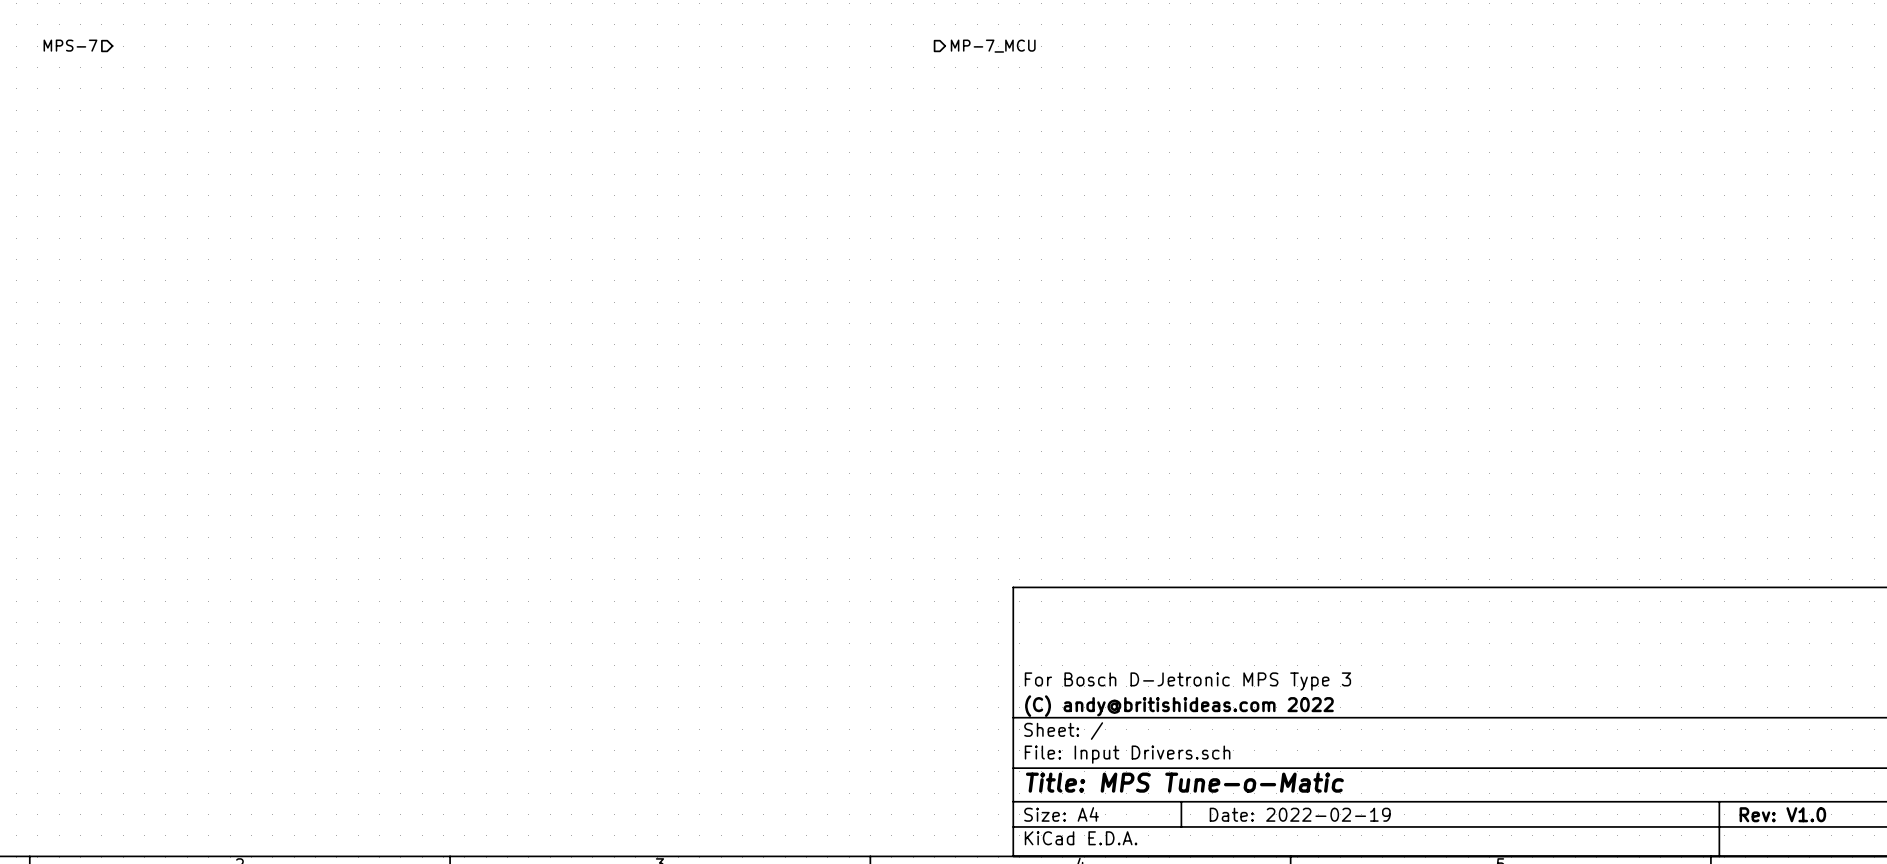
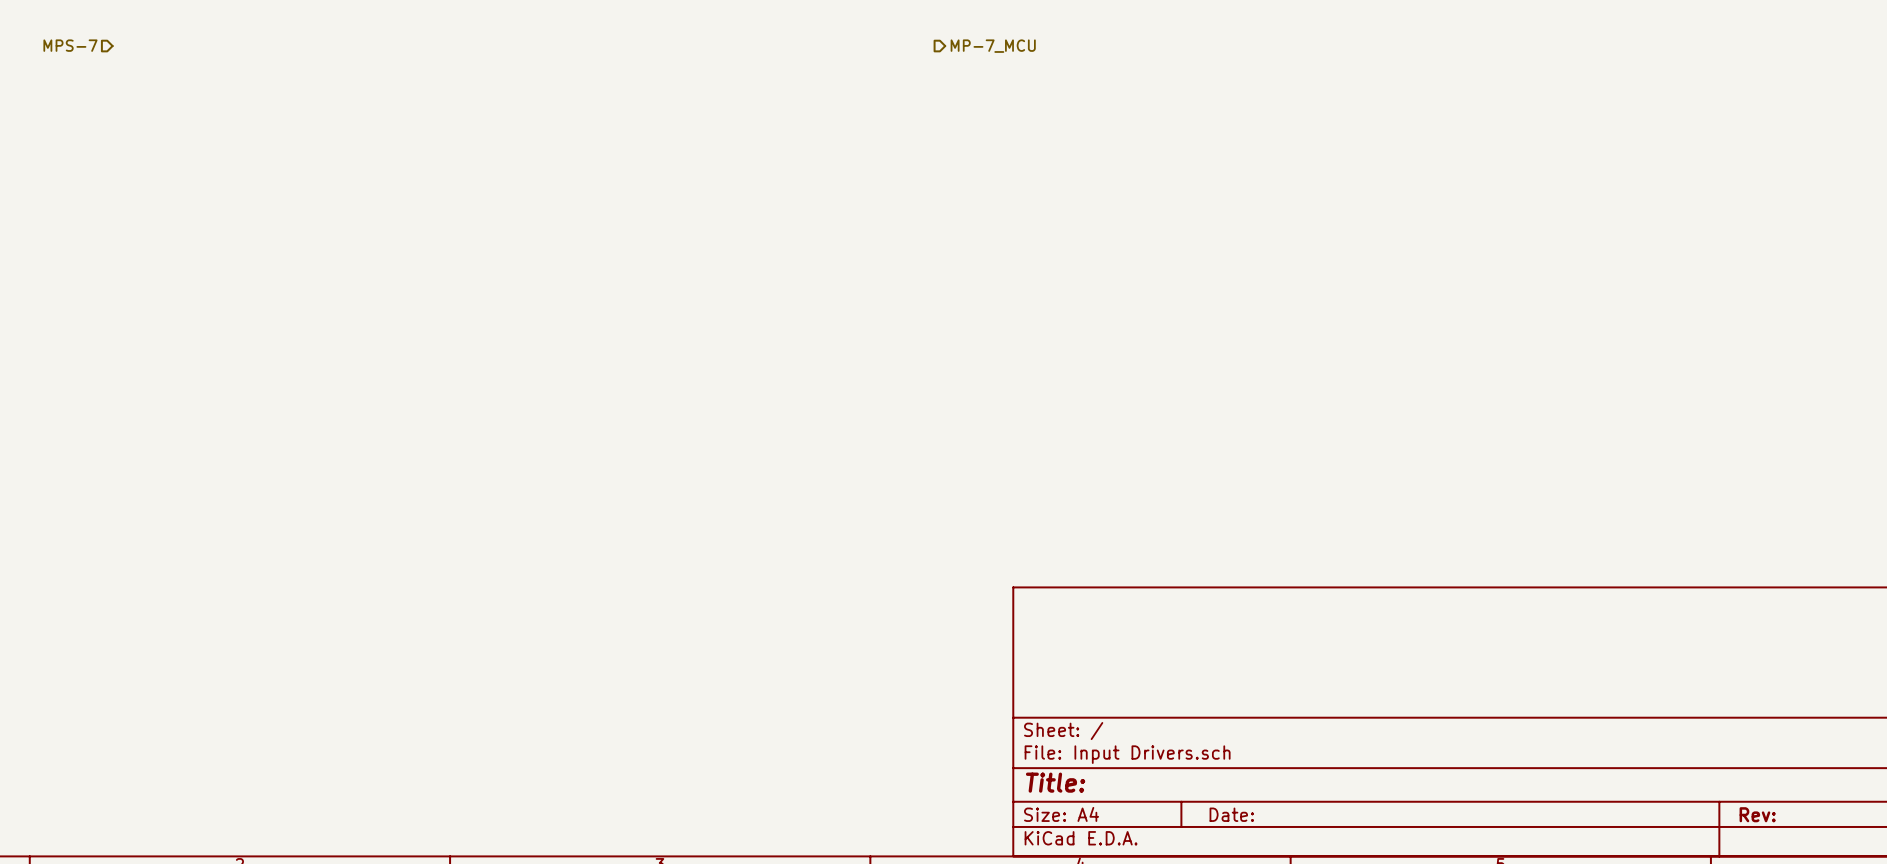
title block: For Bosch D-Jetronic MPS Type 3 (1187, 681) -> none
title block: (C) andy@britishideas.com 2022 (1179, 706) -> none
title block: Title: MPS Tune-o-Matic (1184, 782) -> Title: (1055, 782)
title block: Date: 2022-02-19 (1300, 814) -> Date: (1231, 814)
title block: Rev: V1.0 (1782, 814) -> Rev: (1757, 814)

